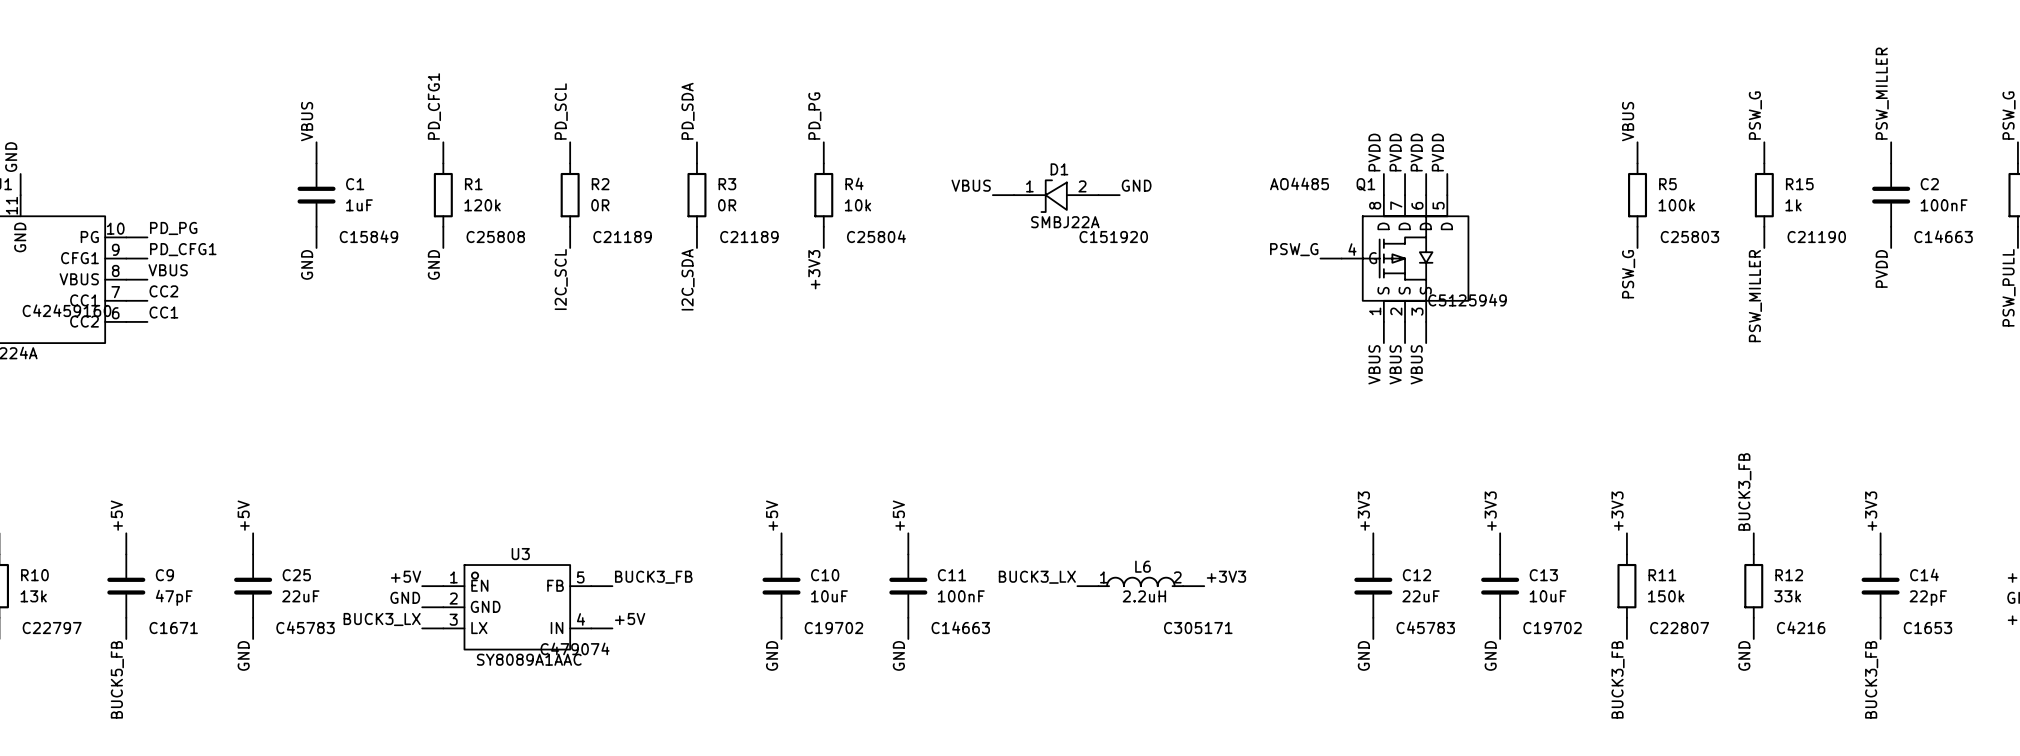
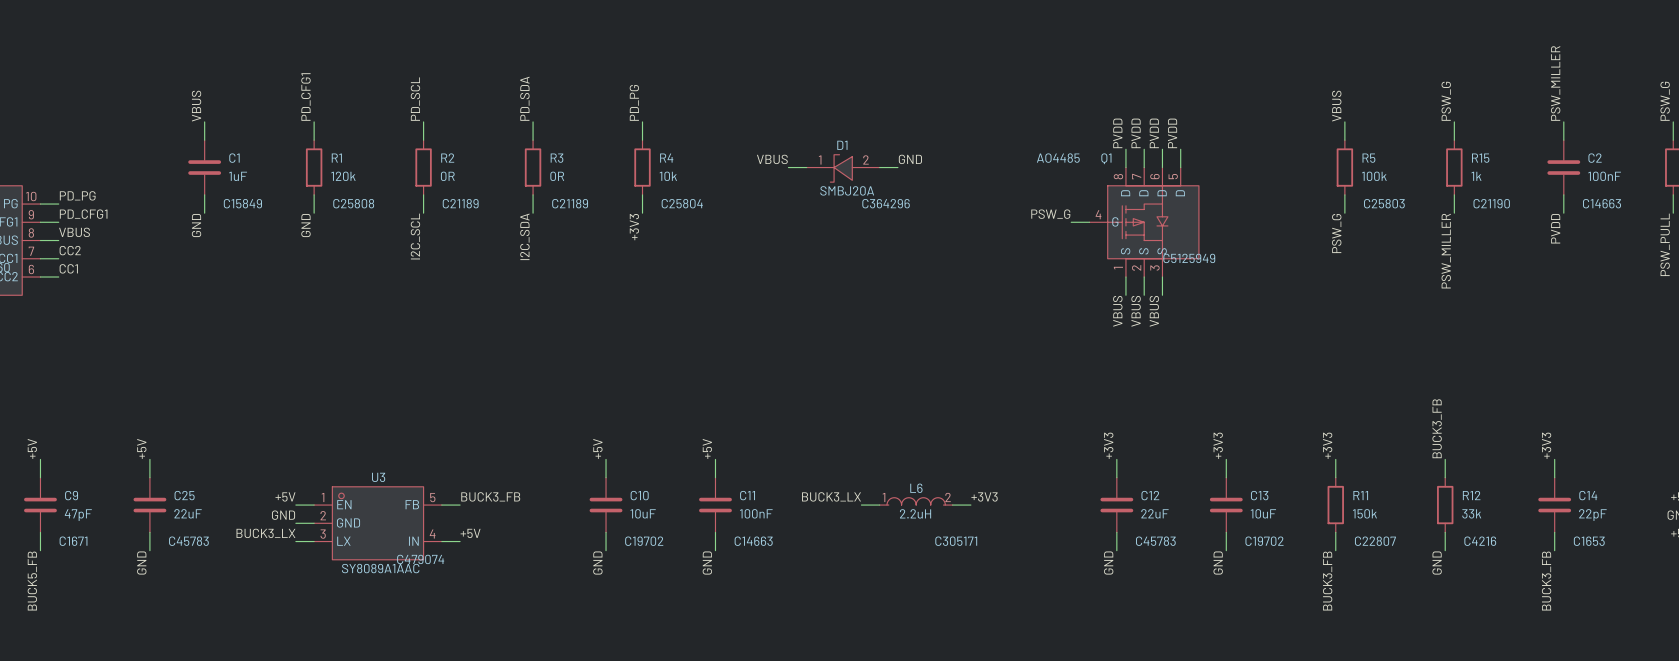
D1 value: SMBJ22A (1065, 222) -> SMBJ20A (847, 190)
D1 text: C151920 (1113, 237) -> C364296 (886, 203)

